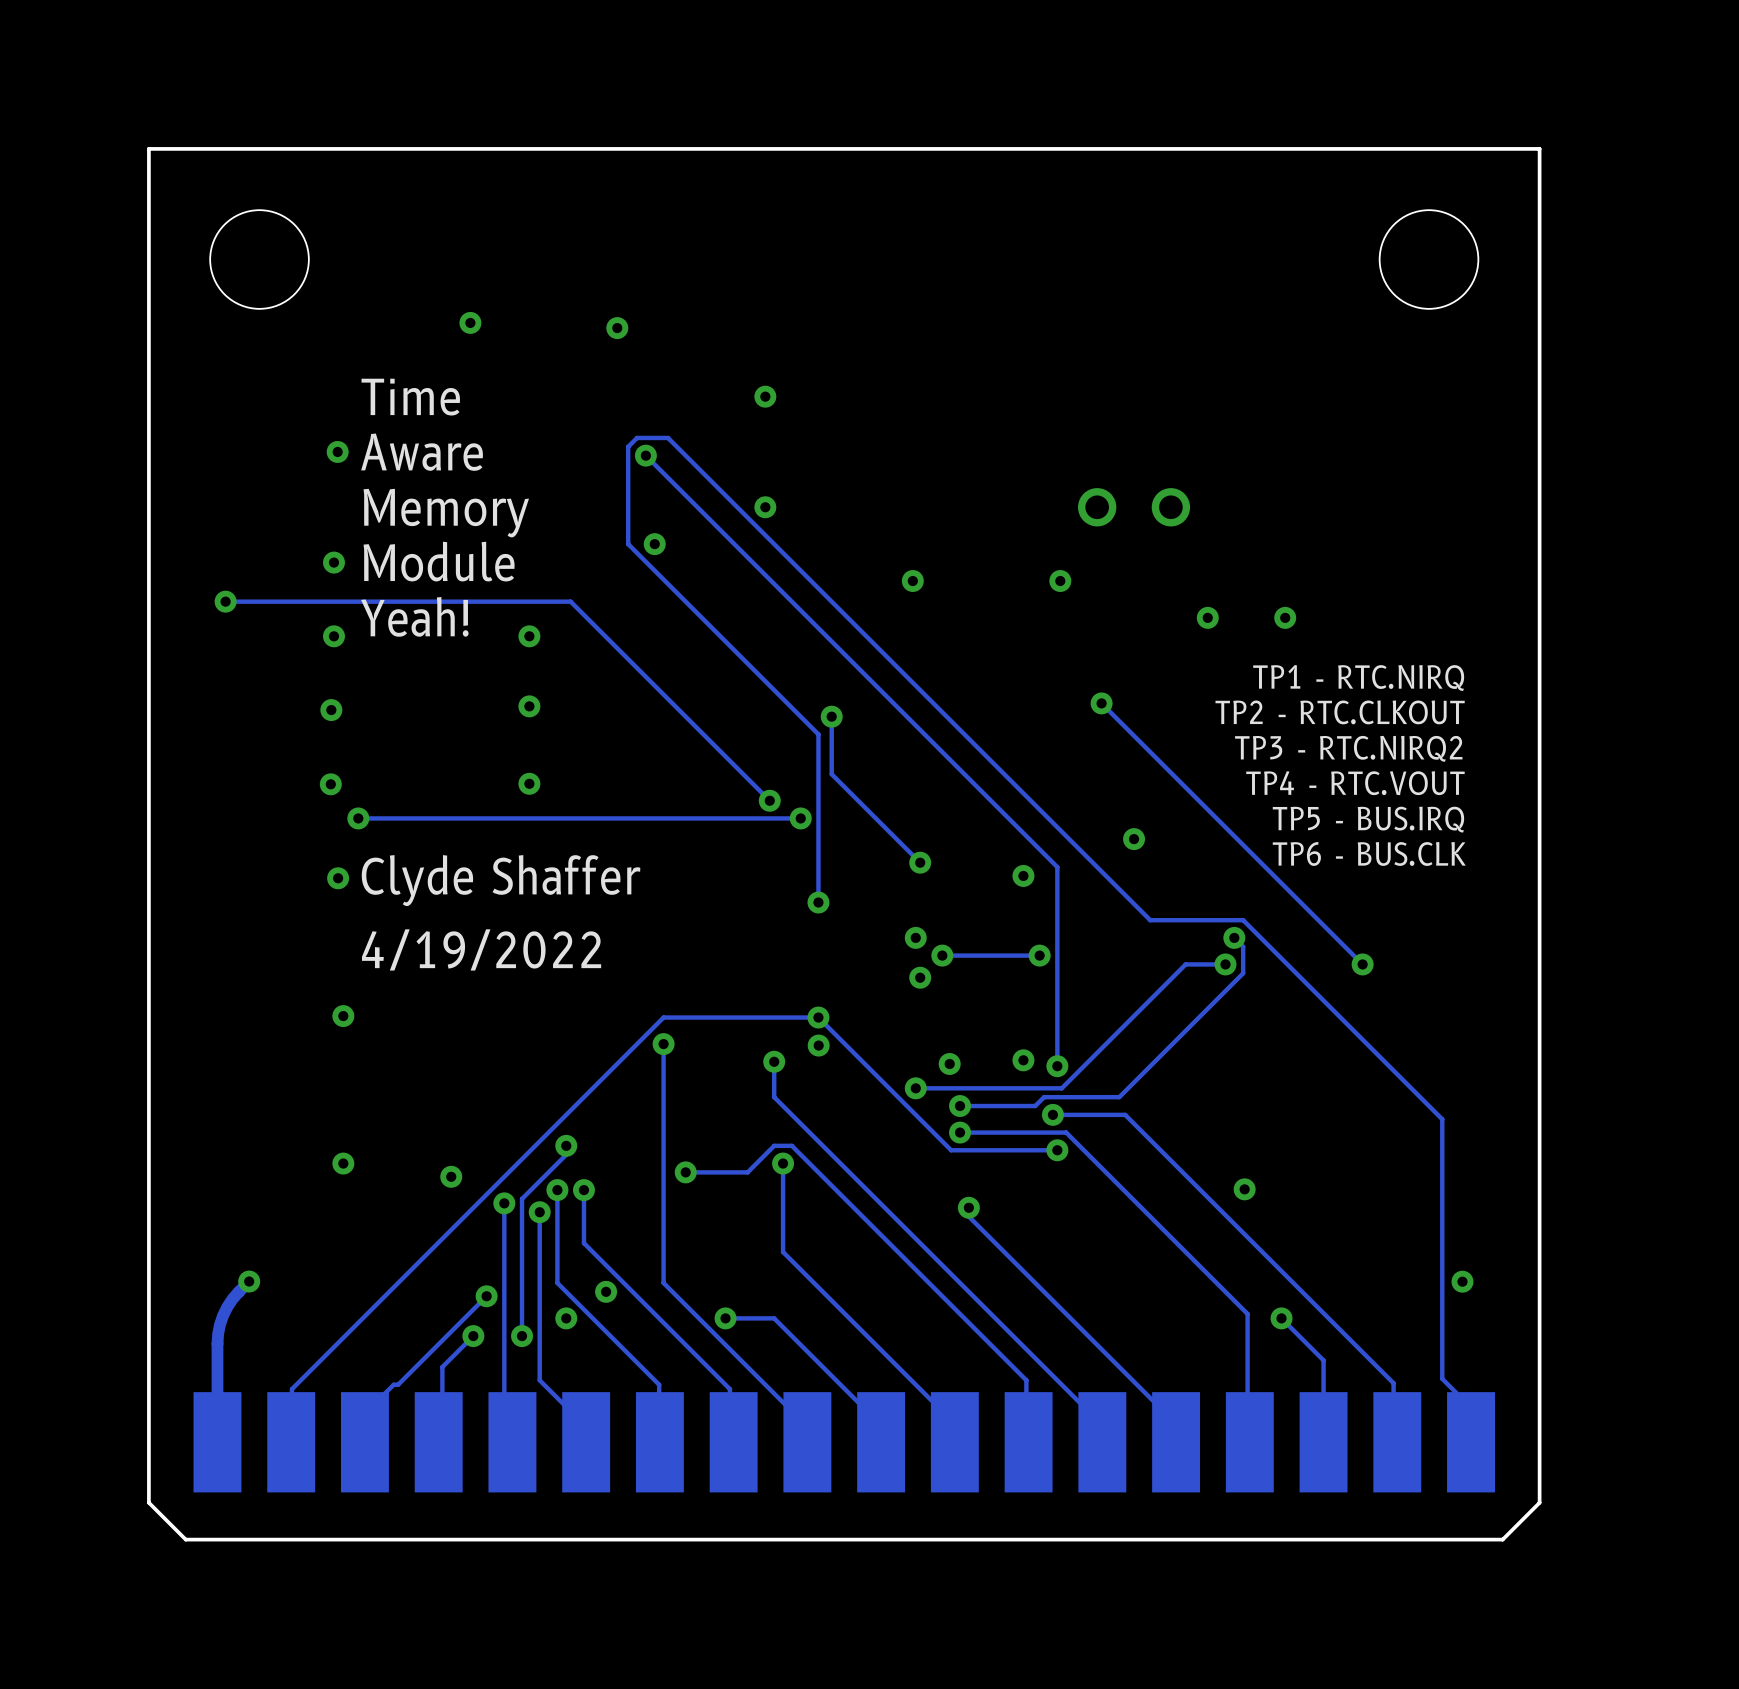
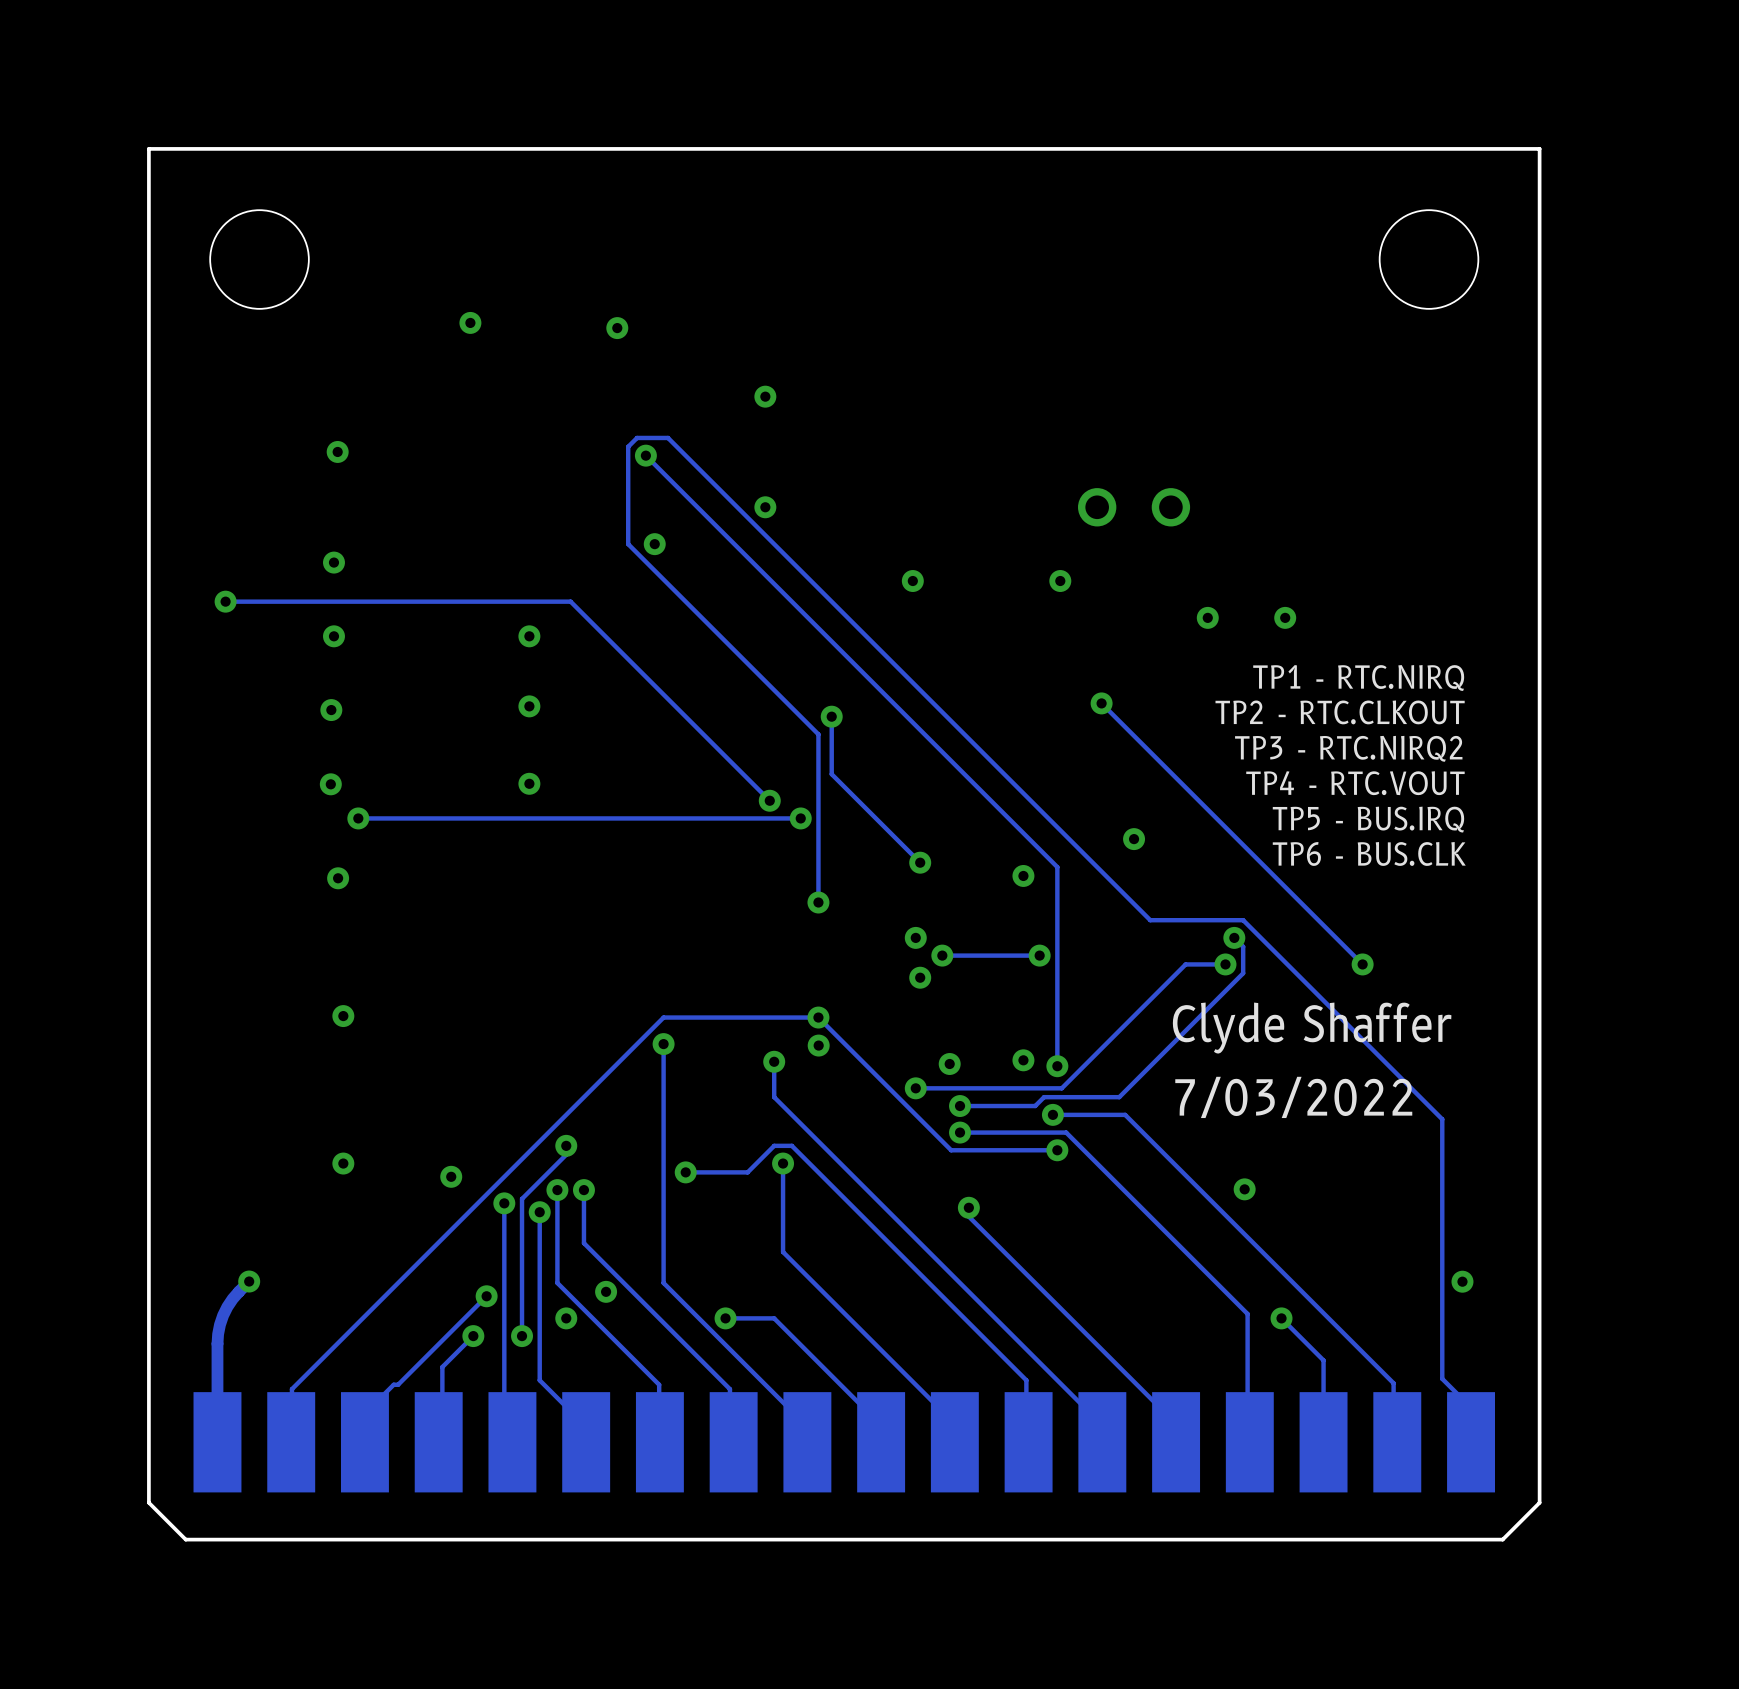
text: Time (410, 397) -> none
text: Aware (422, 452) -> none
text: Memory (446, 513) -> none
text: Module (439, 561) -> none
text: Yeah! (414, 616) -> none
text: Clyde Shaffer (501, 880) -> none
text: 4/19/2022 (481, 949) -> none
text: none -> Clyde Shaffer (1312, 1028)
text: none -> 7/03/2022 (1293, 1097)

